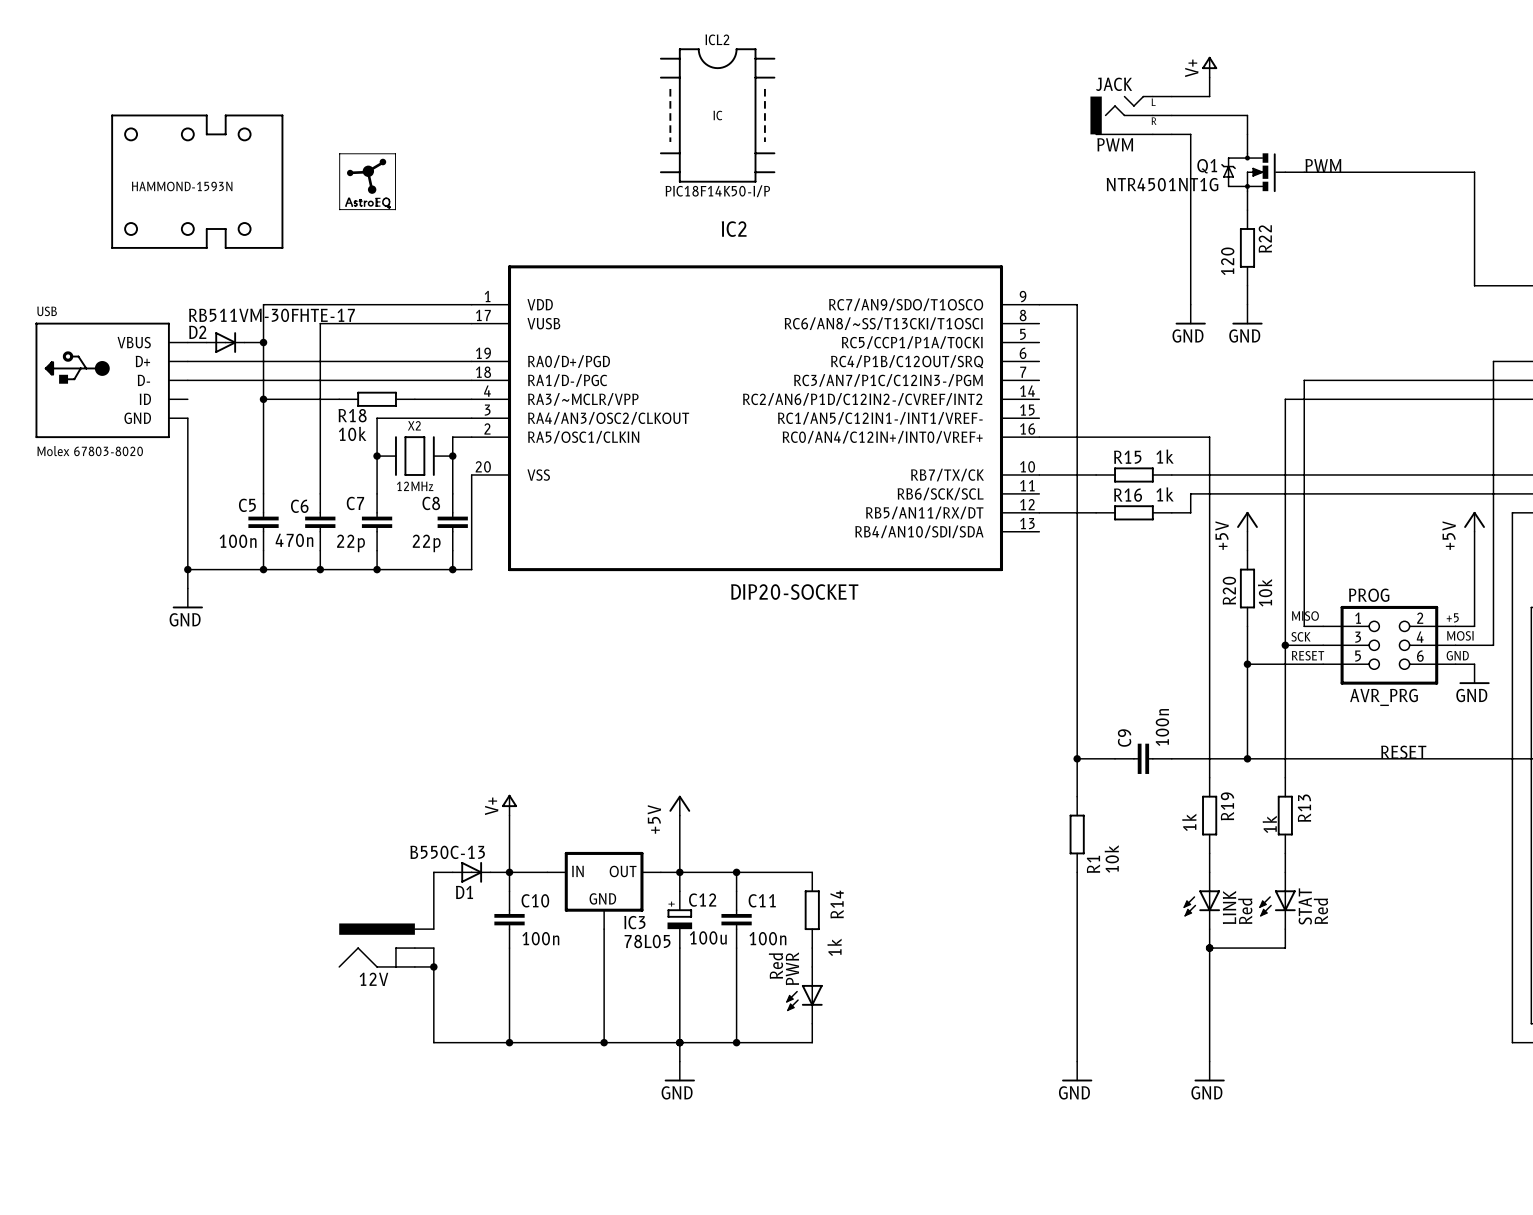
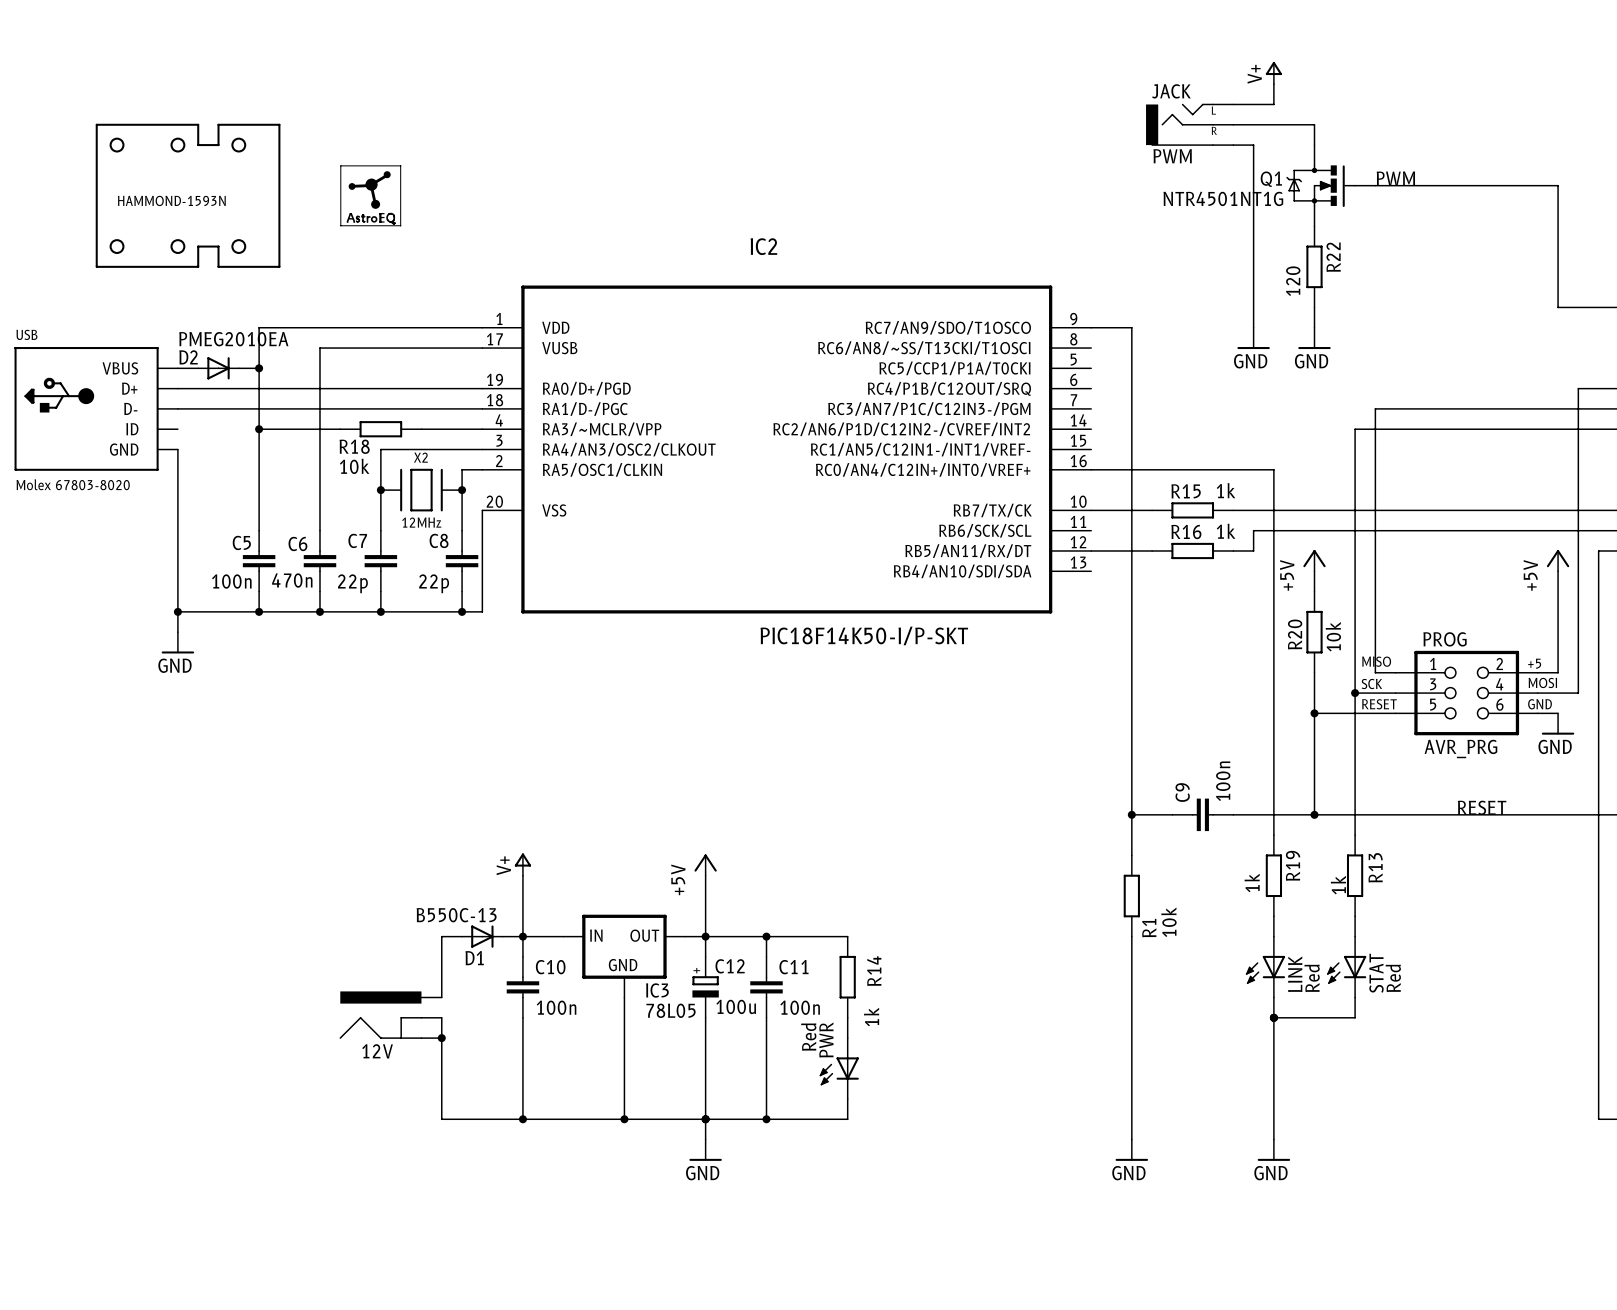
ICL2: PIC18F14K50-I/P (717, 115) -> none
D2 value: RB511VM-30FHTE-17 (271, 315) -> PMEG2010EA (233, 339)
IC2 value: DIP20-SOCKET (794, 592) -> PIC18F14K50-I/P-SKT (864, 635)

